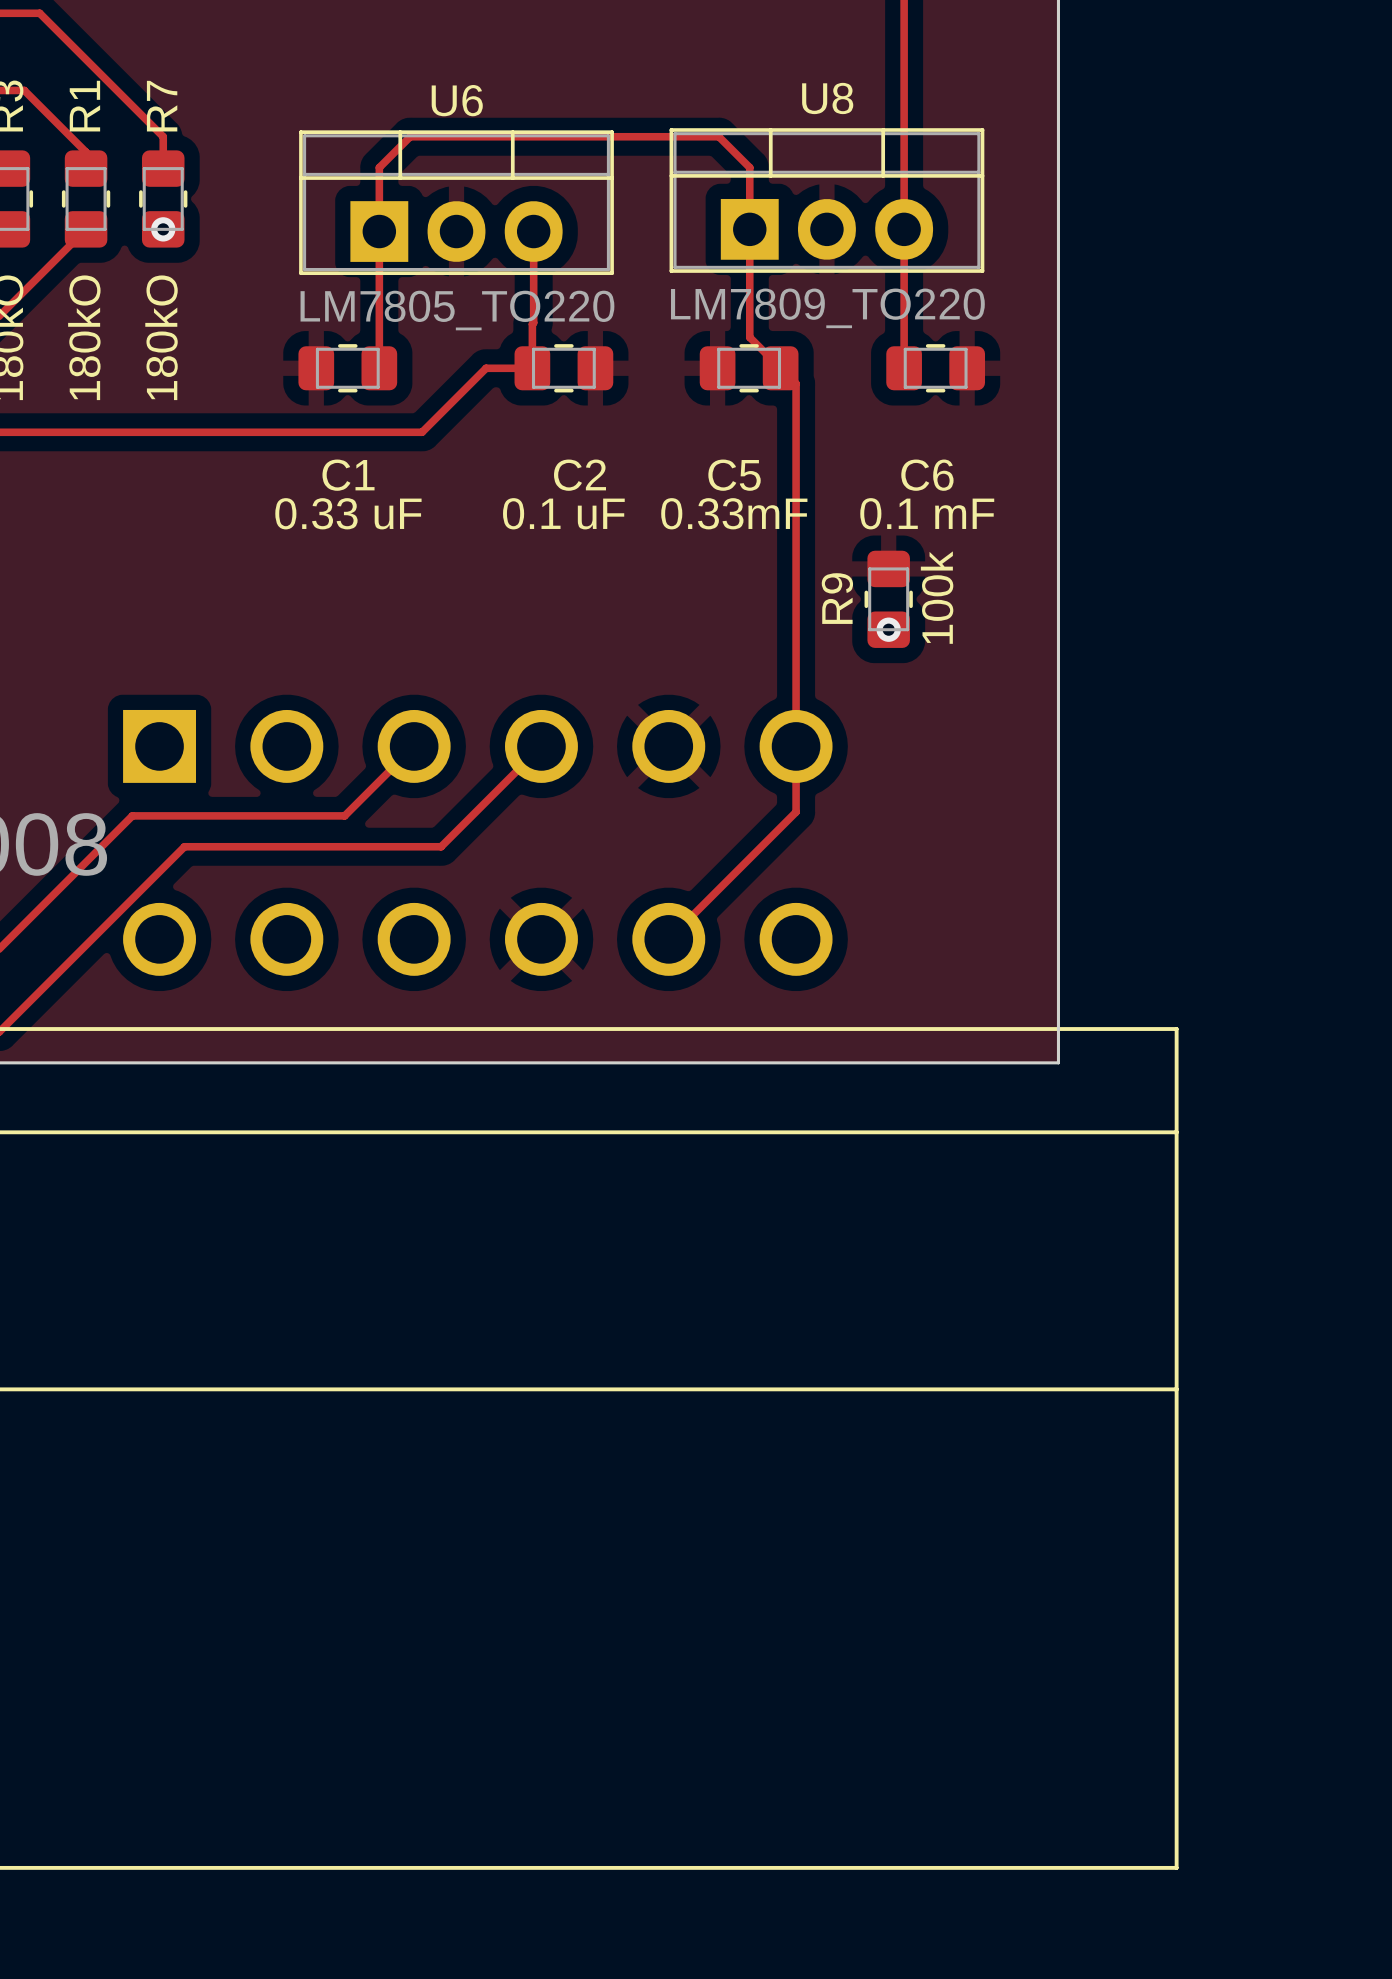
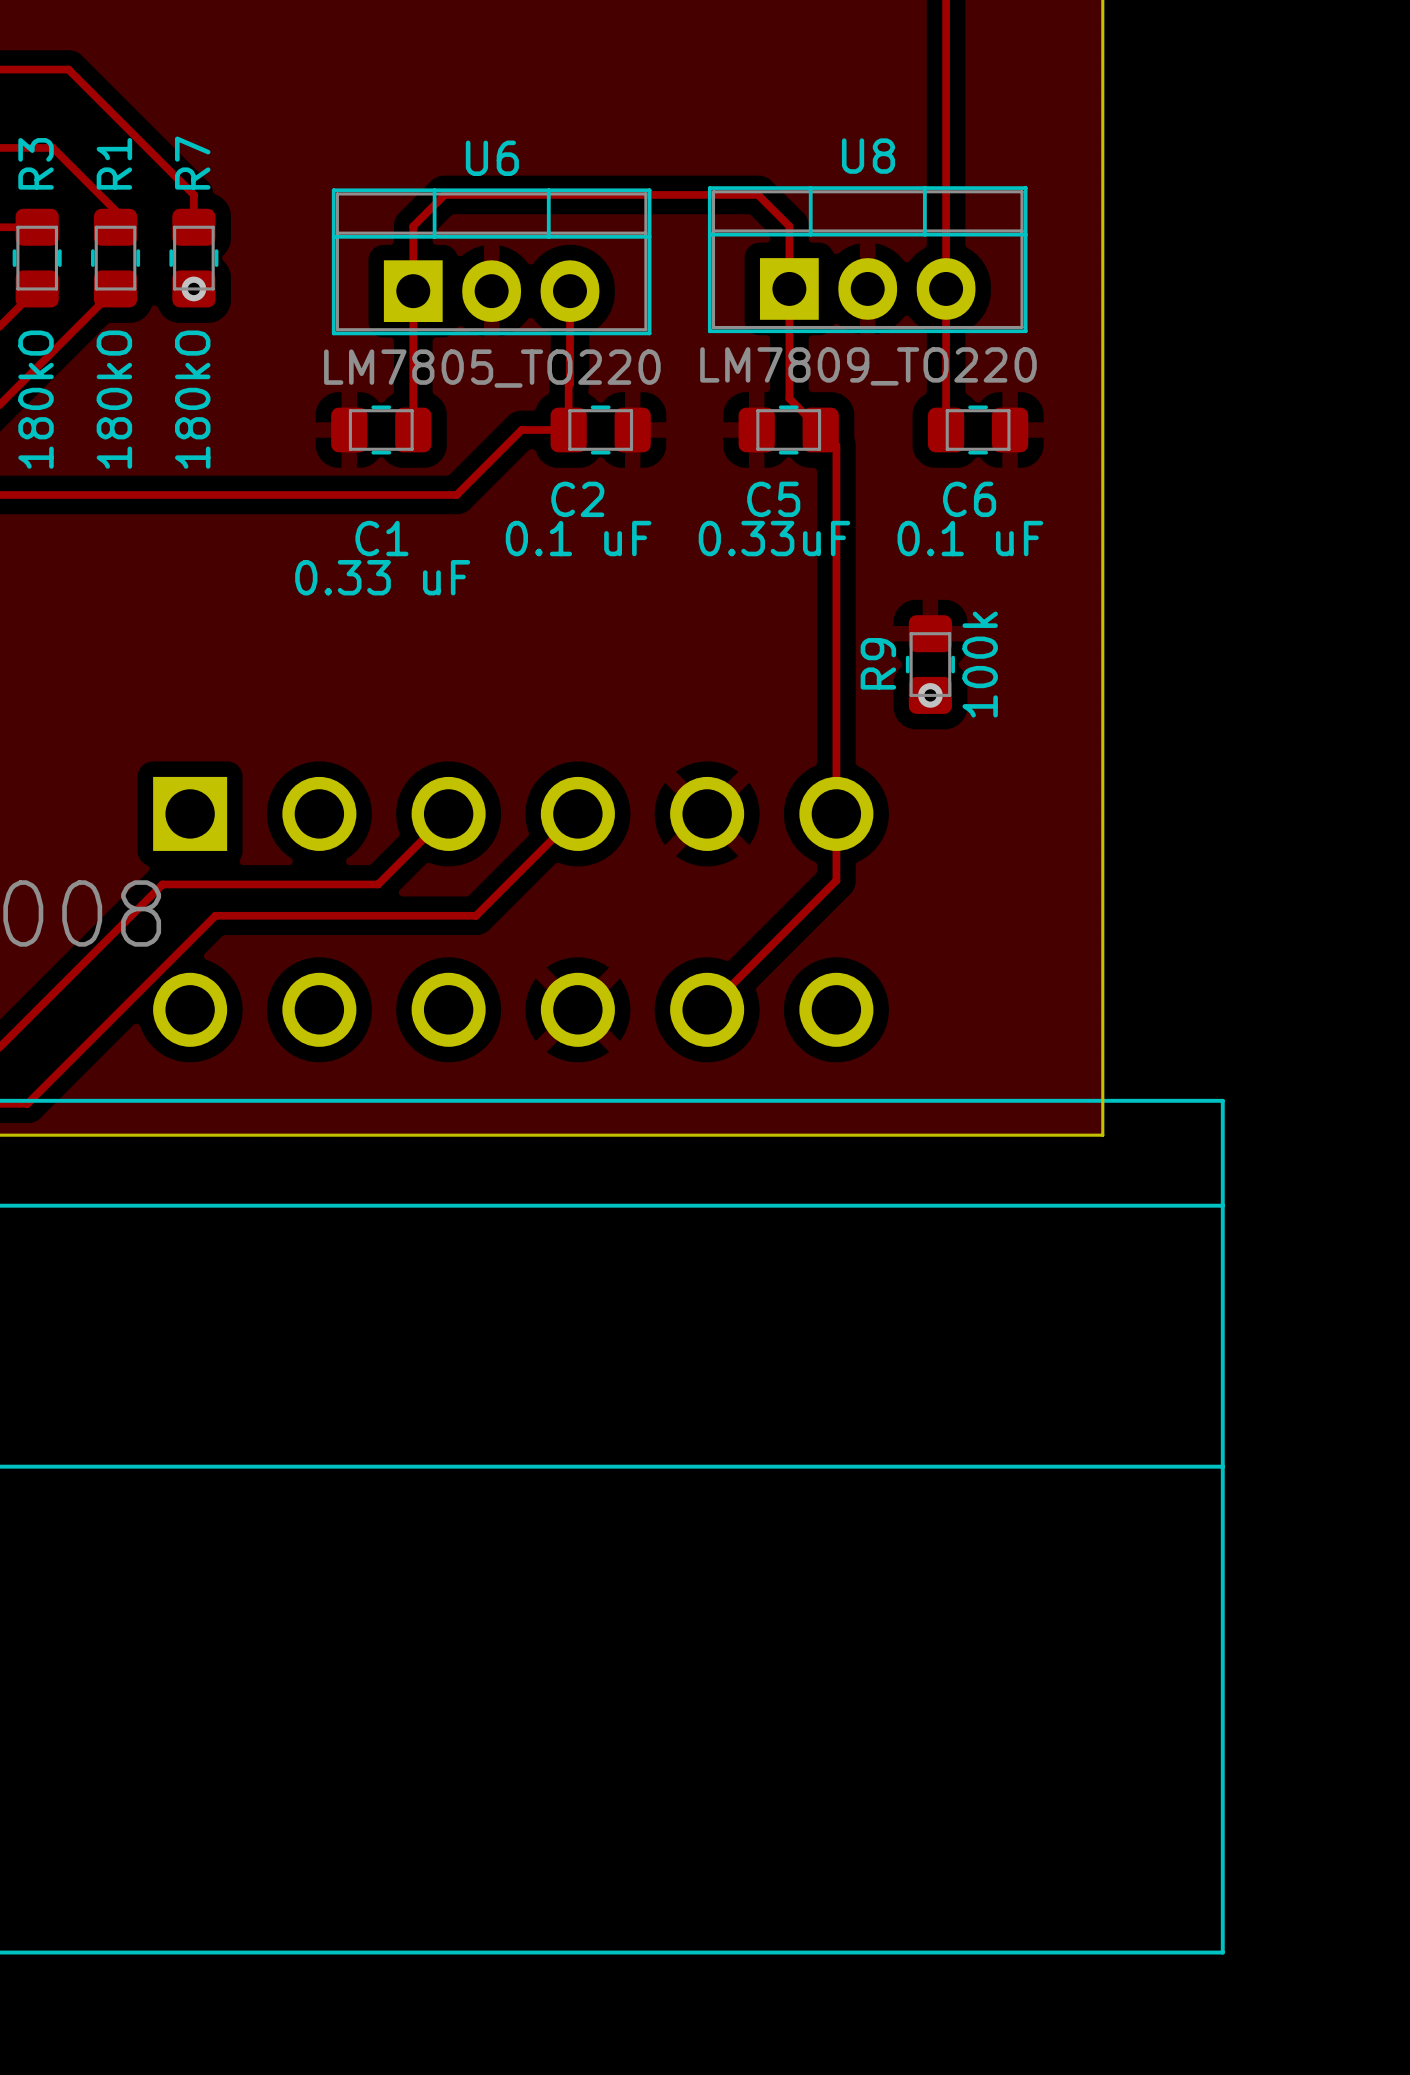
C2 name position: C2 (580, 475) -> C2 (577, 499)
C5 name position: C5 (734, 475) -> C5 (773, 499)
C6 name position: C6 (927, 475) -> C6 (969, 499)
C2 value position: 0.1 uF (563, 513) -> 0.1 uF (578, 538)
C5 value: 0.33mF (734, 513) -> 0.33uF (774, 538)
C6 value: 0.1 mF (927, 513) -> 0.1 uF (970, 538)

